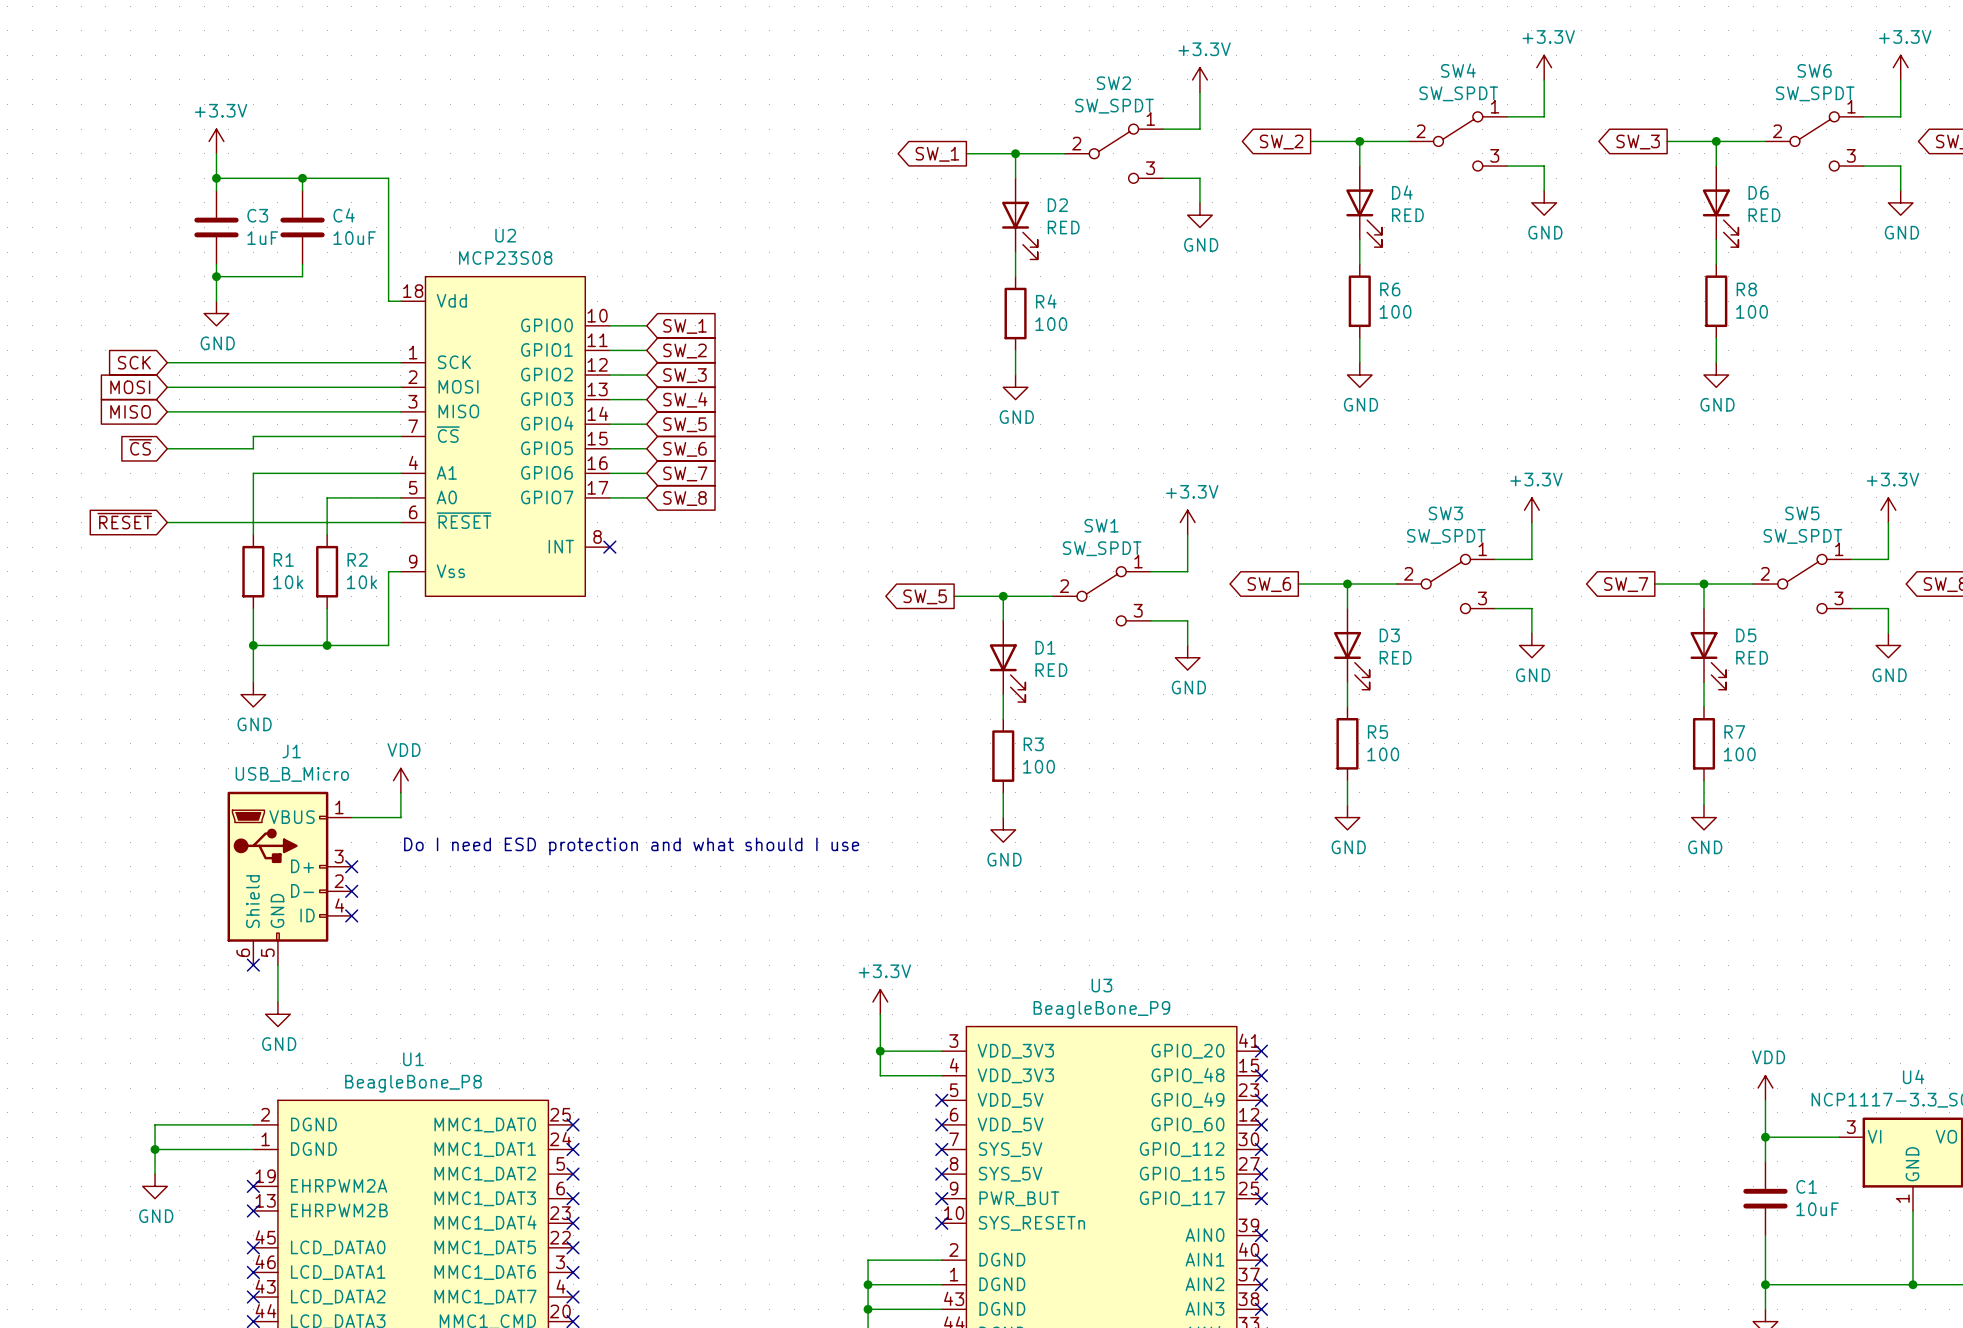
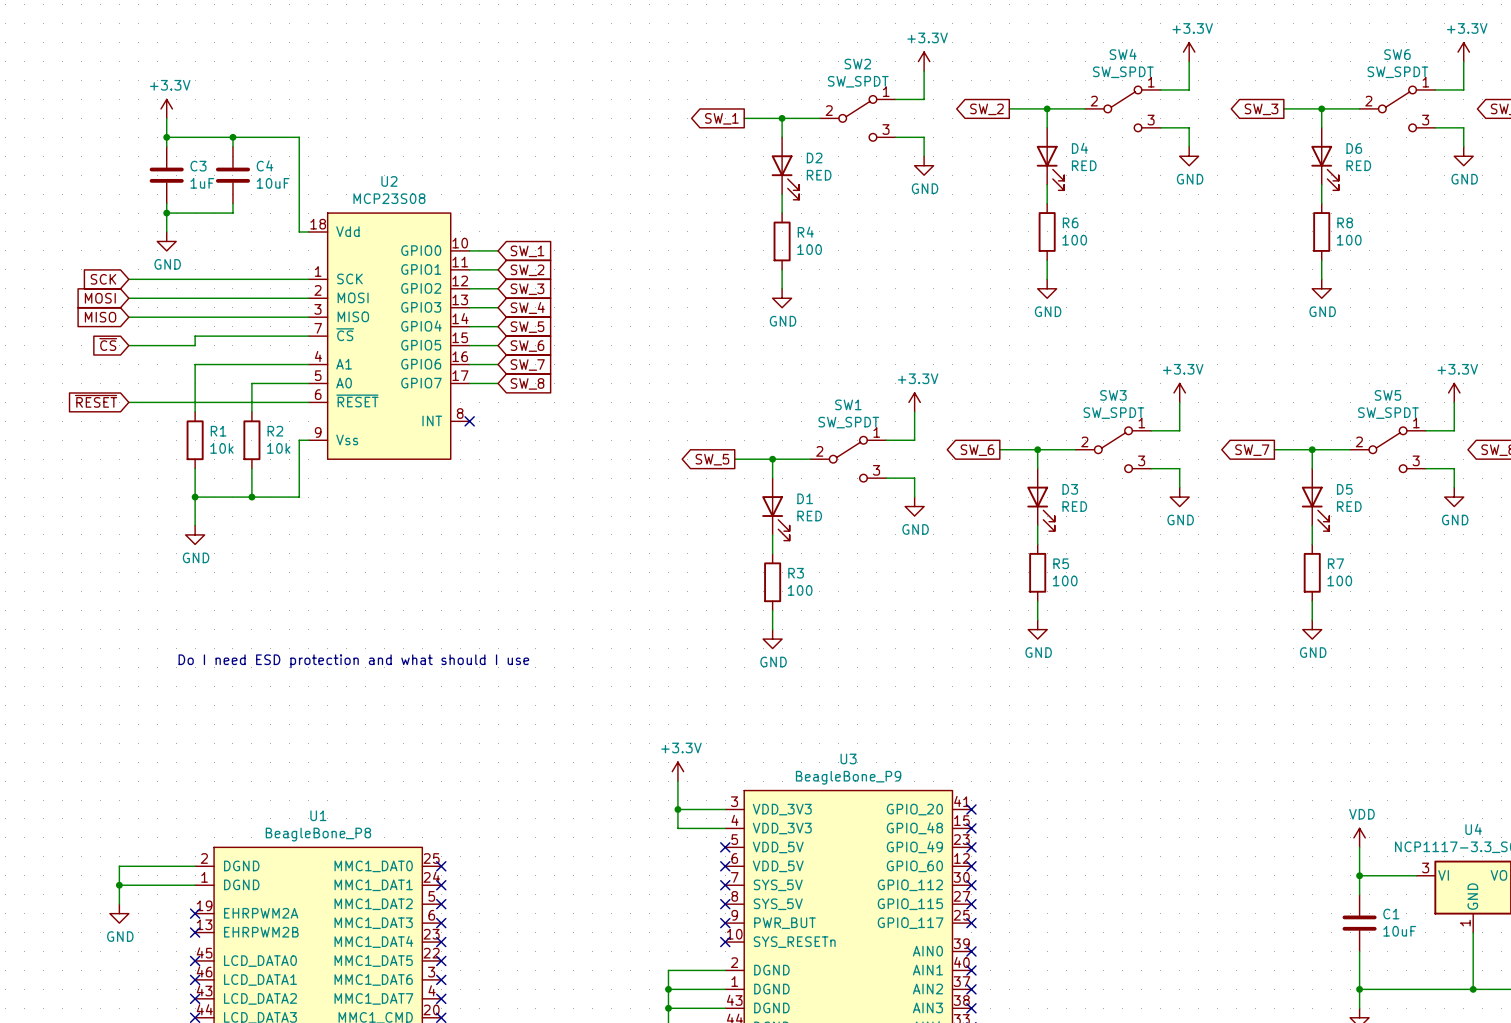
power symbol: VDD (400, 780) -> none
wire: (400, 792) (400, 817) (351, 817) -> none
text position: Do I need ESD protection and what should I use (631, 846) -> Do I need ESD protection and what should I use (353, 661)
no-connect mark: (351, 866) -> none
J1: USB_B_Micro (289, 878) -> none
no-connect mark: (351, 891) -> none
no-connect mark: (351, 915) -> none
no-connect mark: (253, 965) -> none
wire: (277, 965) (277, 1001) -> none
power symbol: GND (277, 1014) -> none

